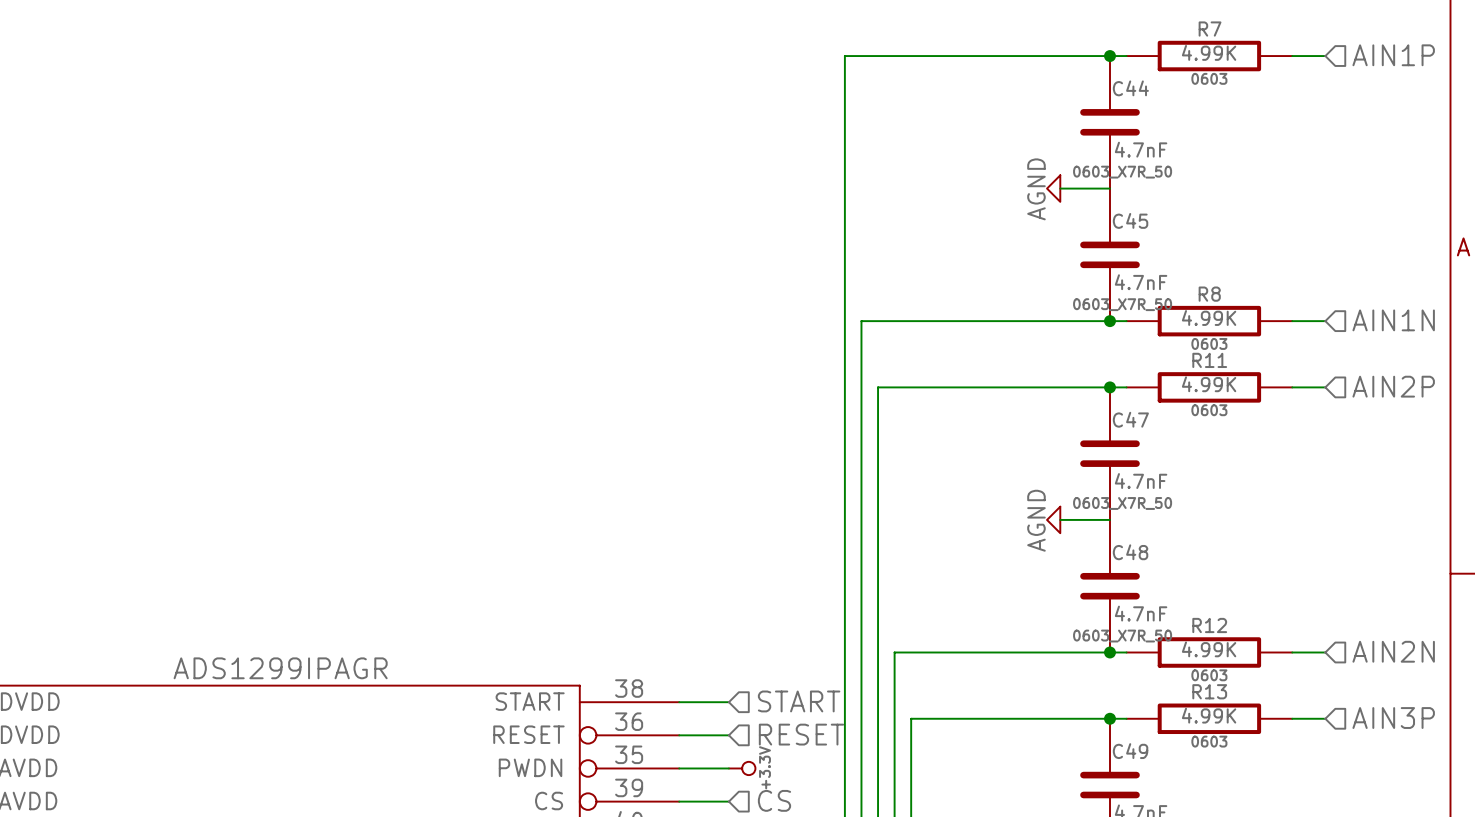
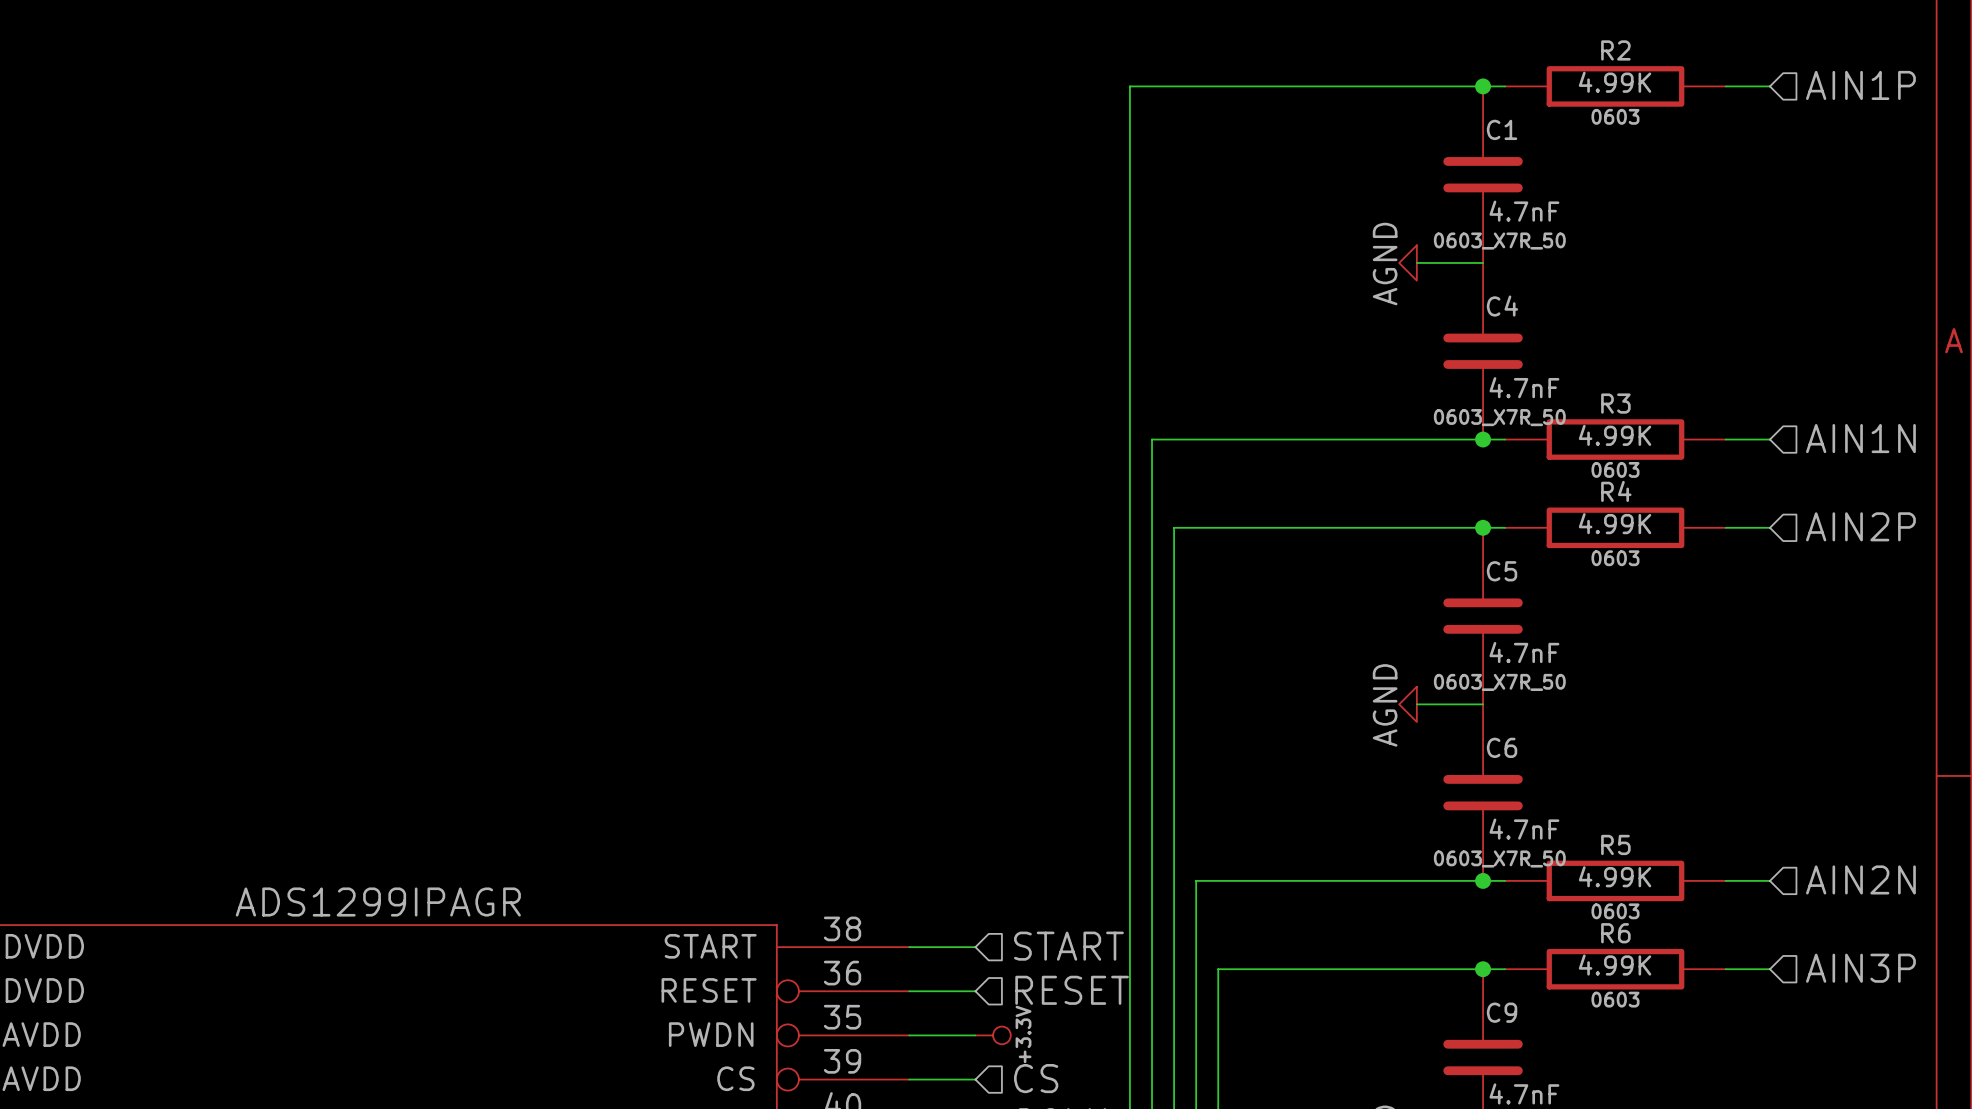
R7 name: R7 (1210, 29) -> R2 (1615, 50)
C44 name: C44 (1130, 88) -> C1 (1502, 129)
C45 name: C45 (1130, 220) -> C4 (1502, 306)
R8 name: R8 (1209, 294) -> R3 (1615, 403)
R11 name: R11 (1209, 360) -> R4 (1616, 491)
C47 name: C47 (1130, 419) -> C5 (1502, 571)
C48 name: C48 (1130, 552) -> C6 (1502, 747)
R12 name: R12 (1209, 625) -> R5 (1615, 844)
R13 name: R13 (1209, 691) -> R6 (1615, 933)
C49 name: C49 (1130, 751) -> C9 (1502, 1012)

